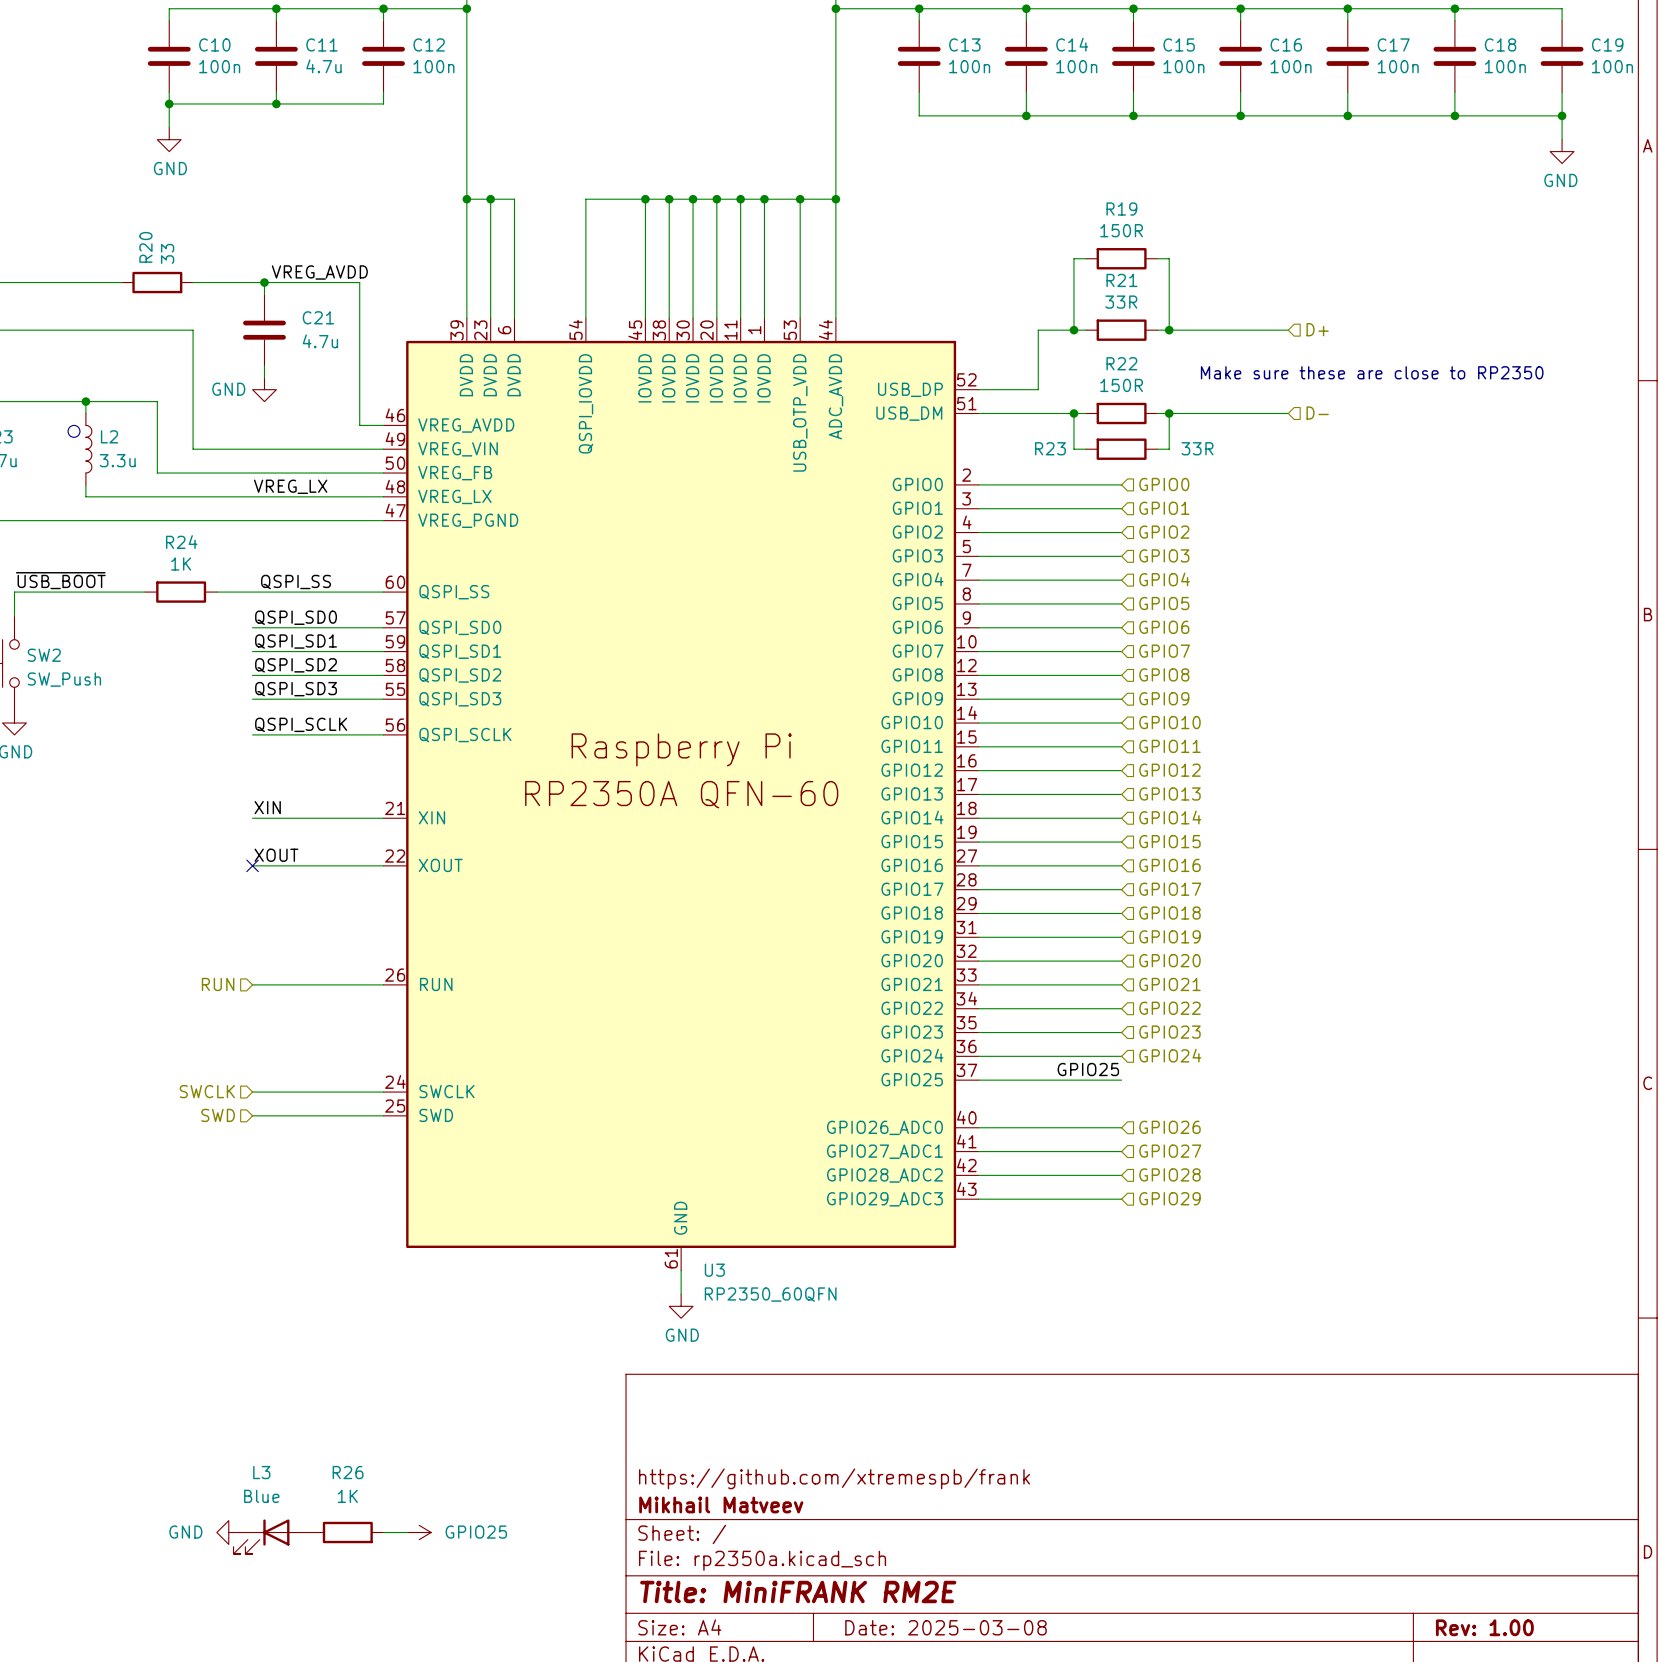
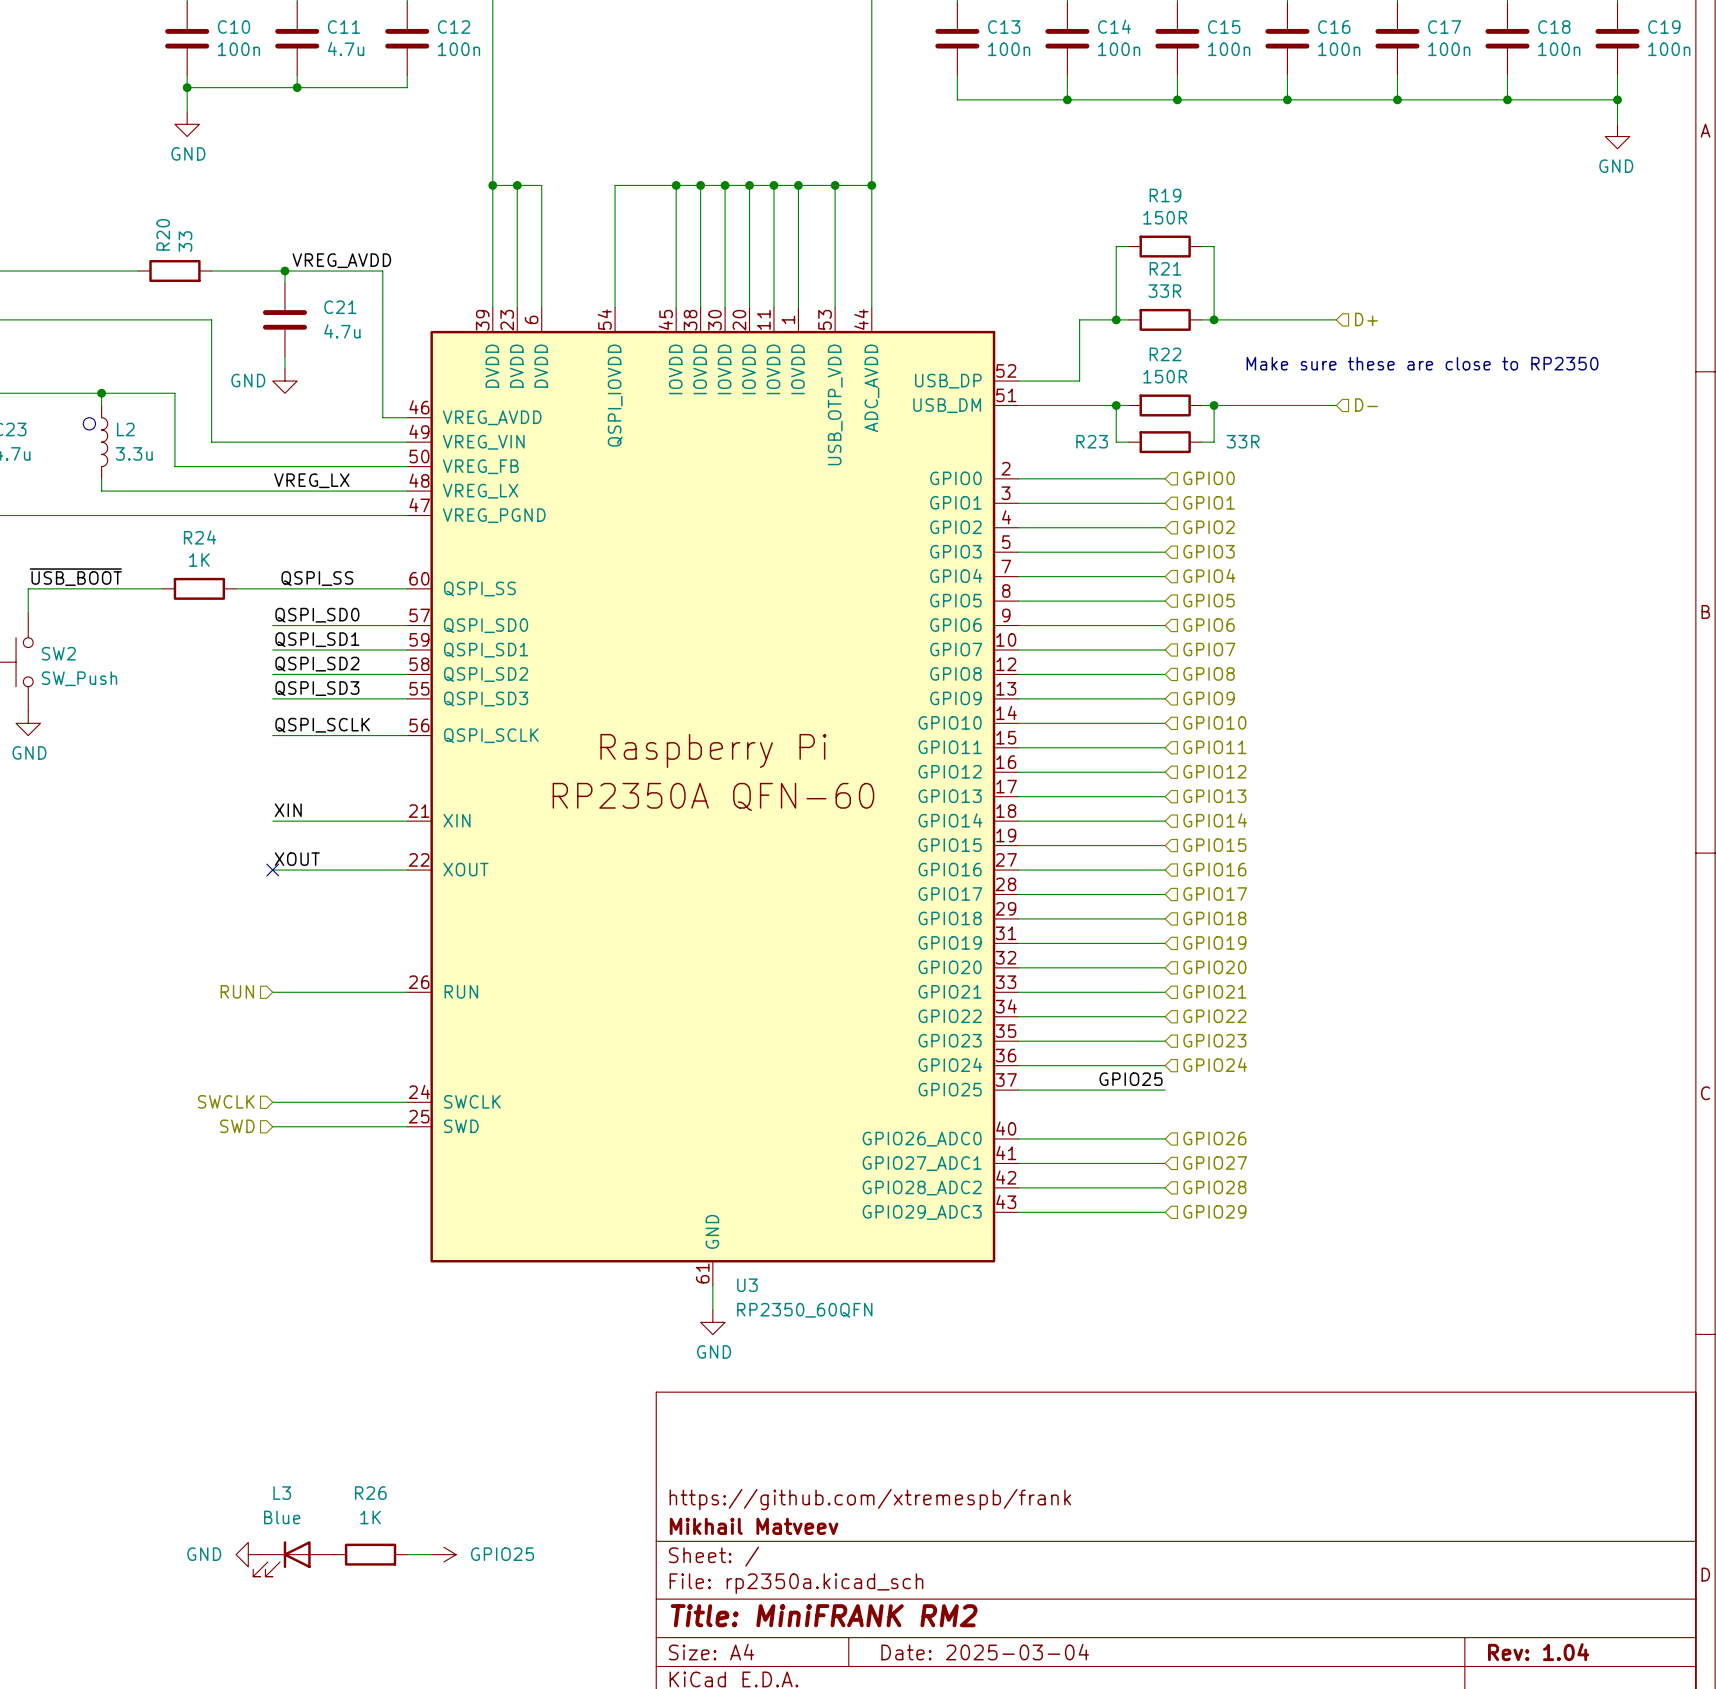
title block: Title: MiniFRANK RM2E (798, 1591) -> Title: MiniFRANK RM2 (824, 1615)
title block: Date: 2025-03-08 (945, 1627) -> Date: 2025-03-04 (985, 1652)
title block: Rev: 1.00 (1484, 1627) -> Rev: 1.04 (1538, 1652)

